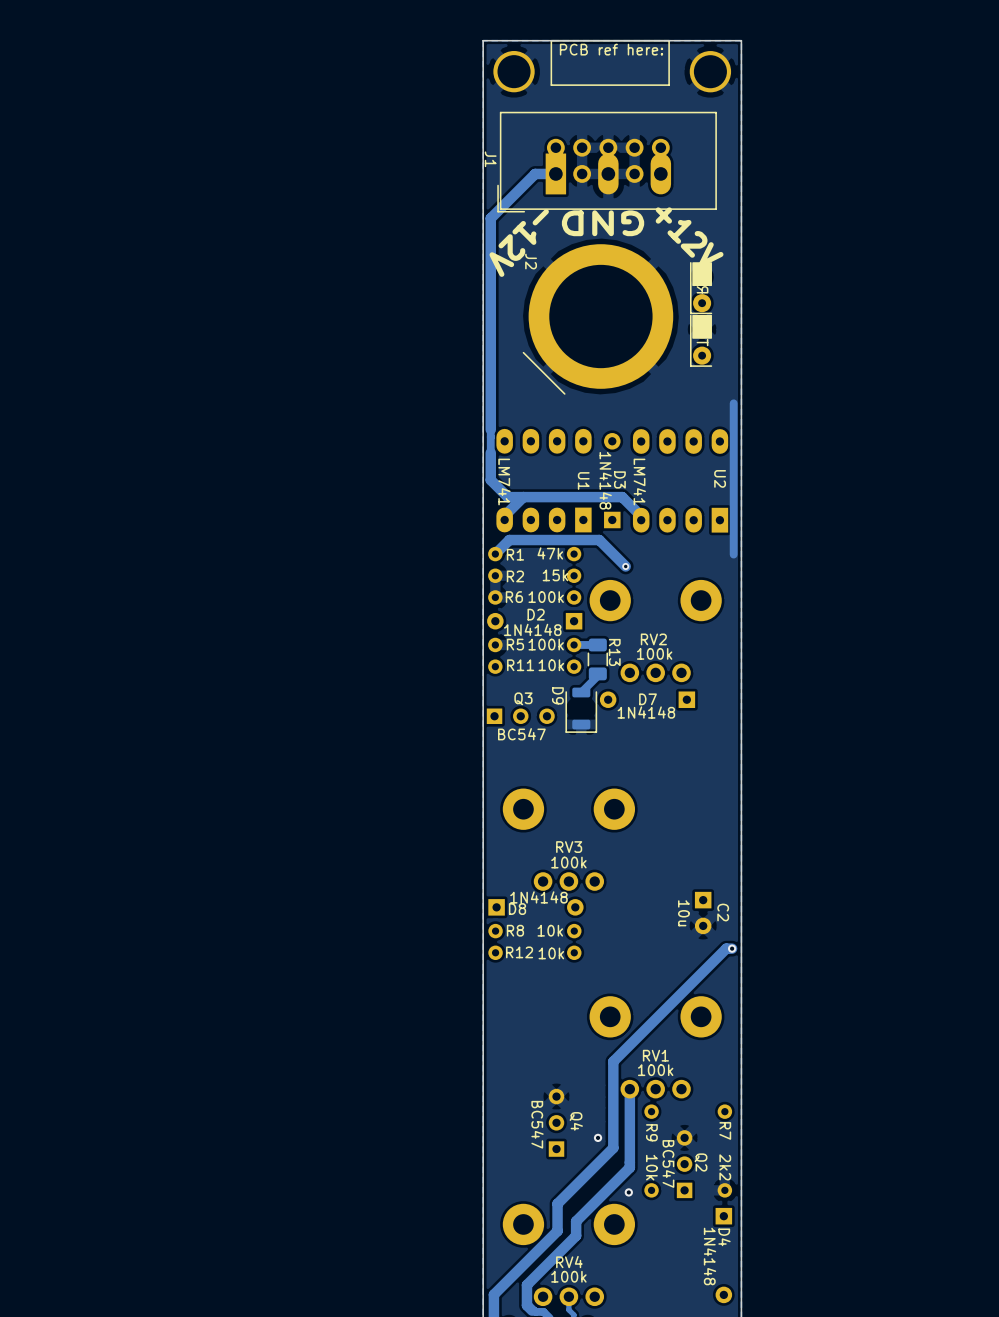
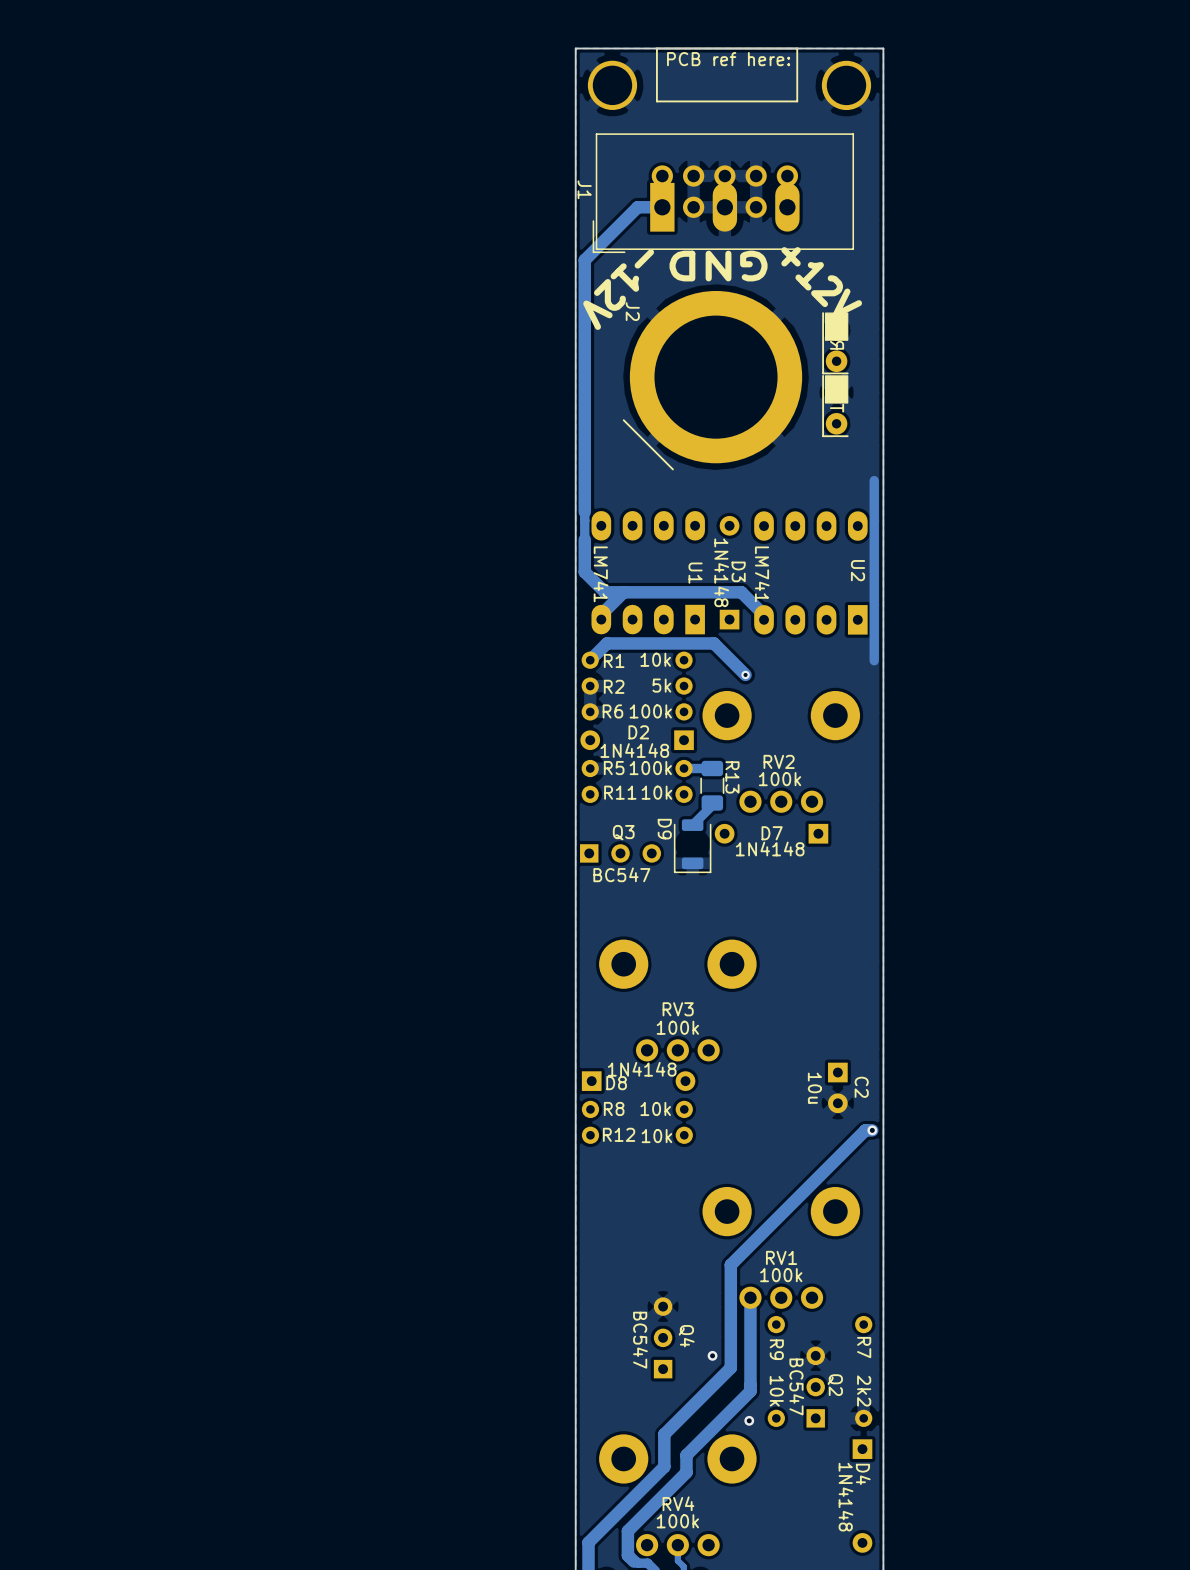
R1 value: 47k (550, 553) -> 10k (655, 659)
R2 value: 15k (555, 575) -> 5k (661, 685)

